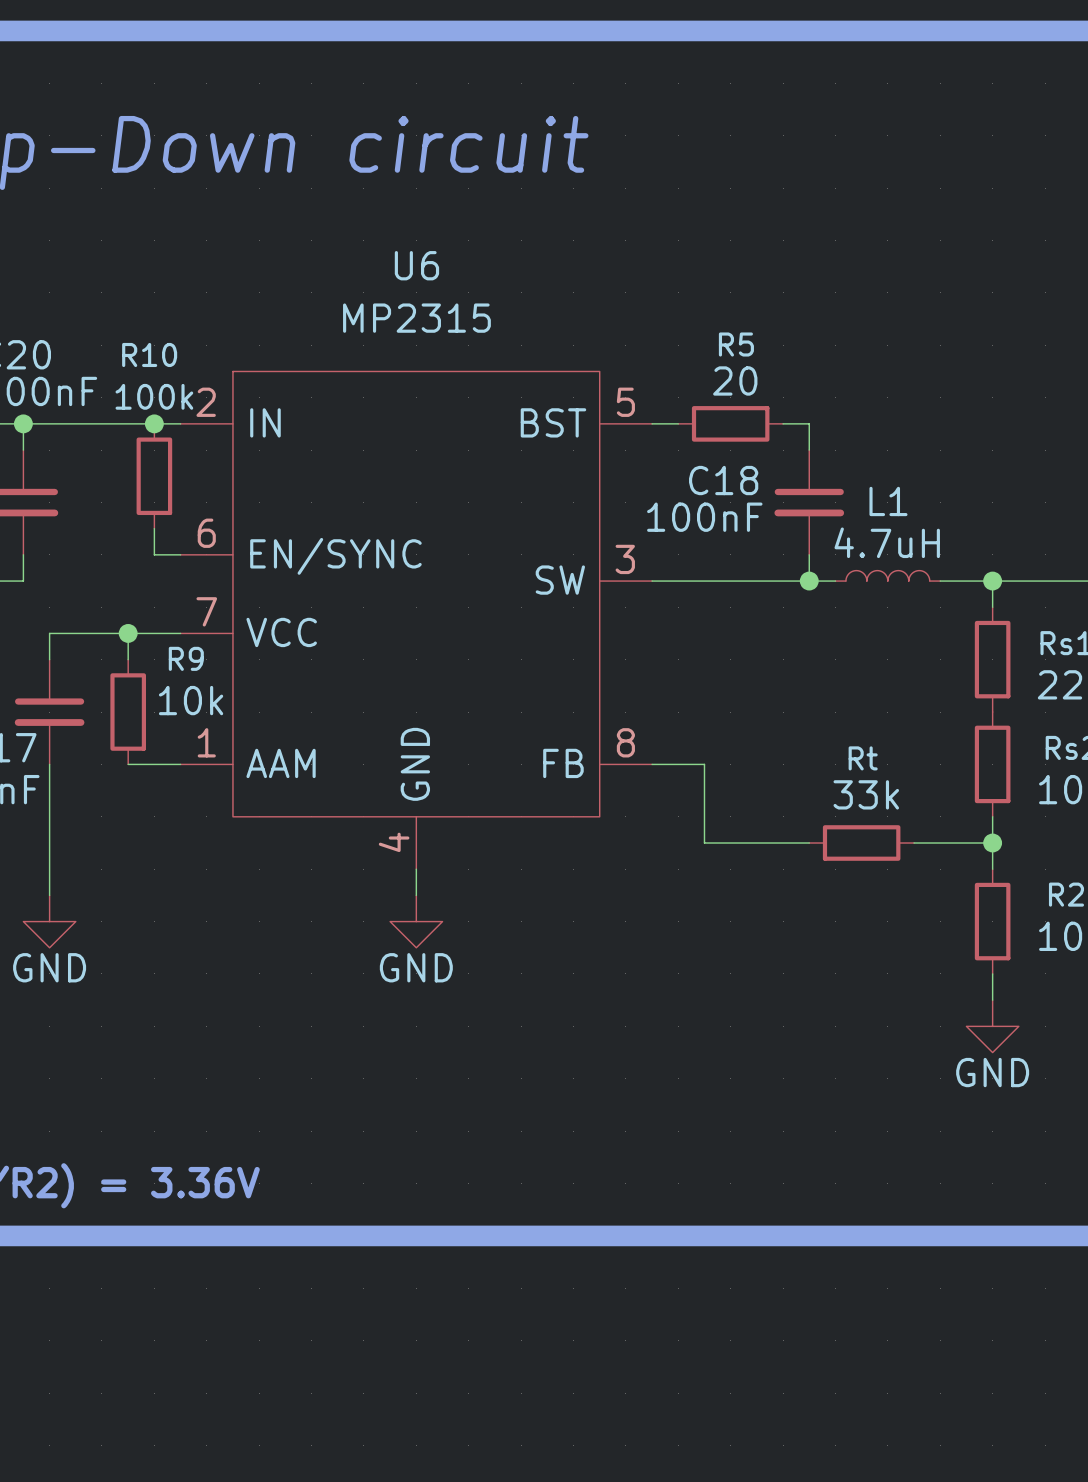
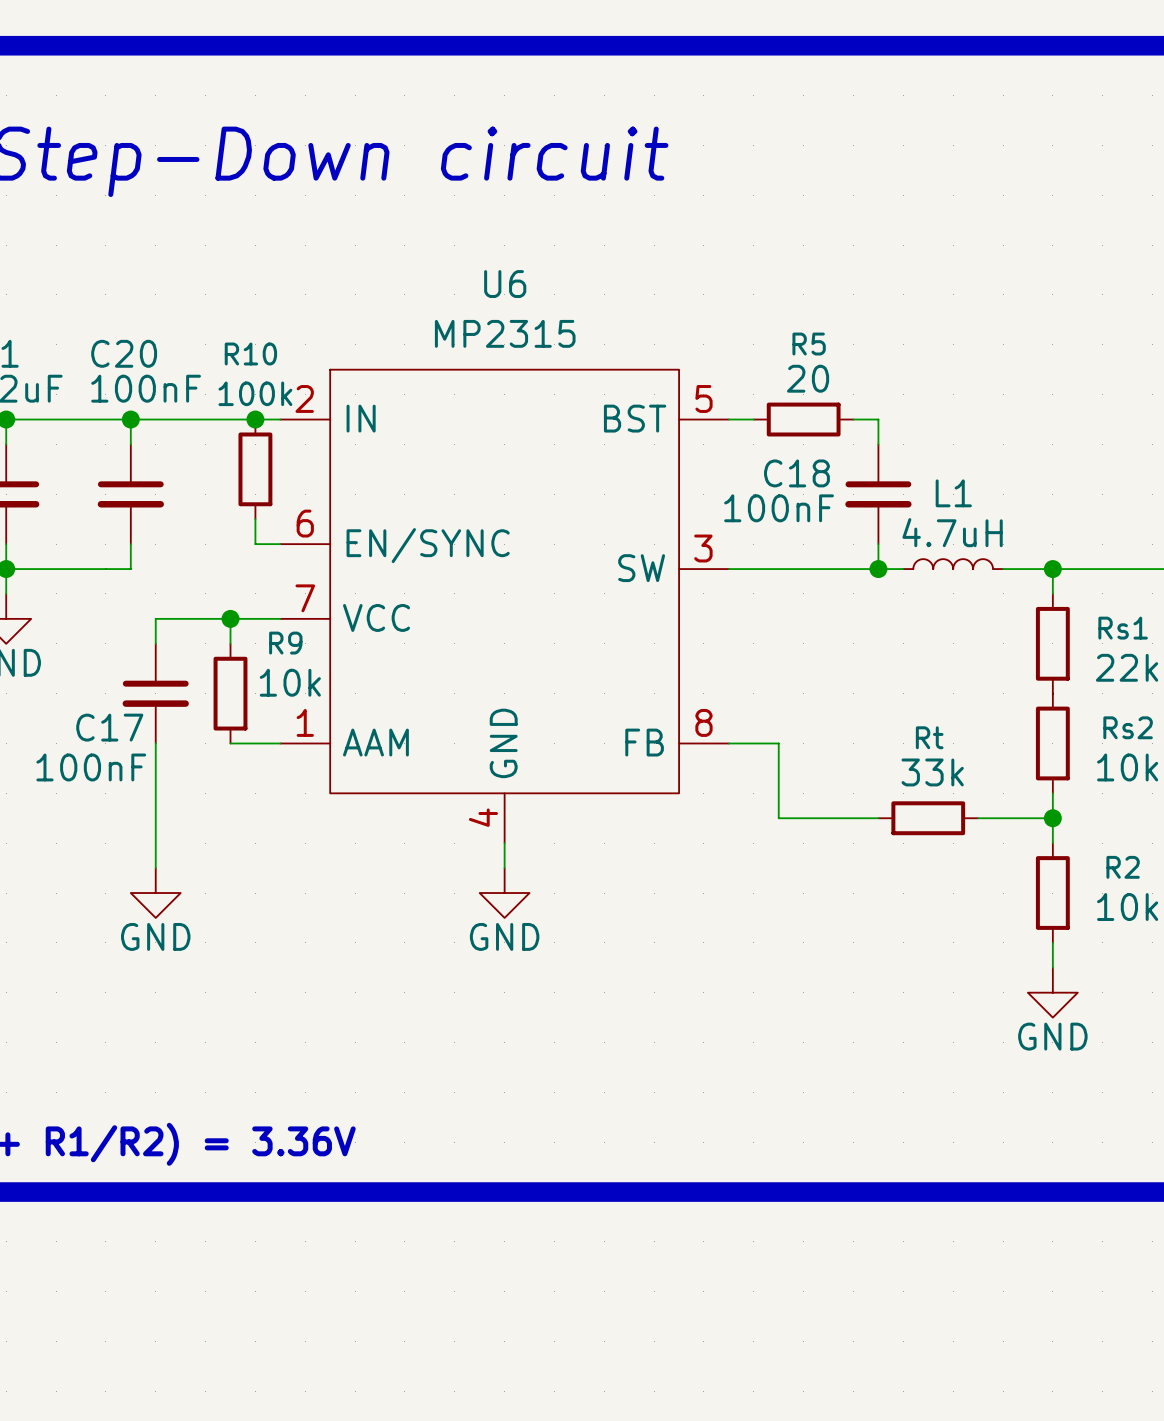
U6 name position: U6 (416, 265) -> U6 (505, 284)
U6 value position: MP2315 (416, 318) -> MP2315 (505, 333)

